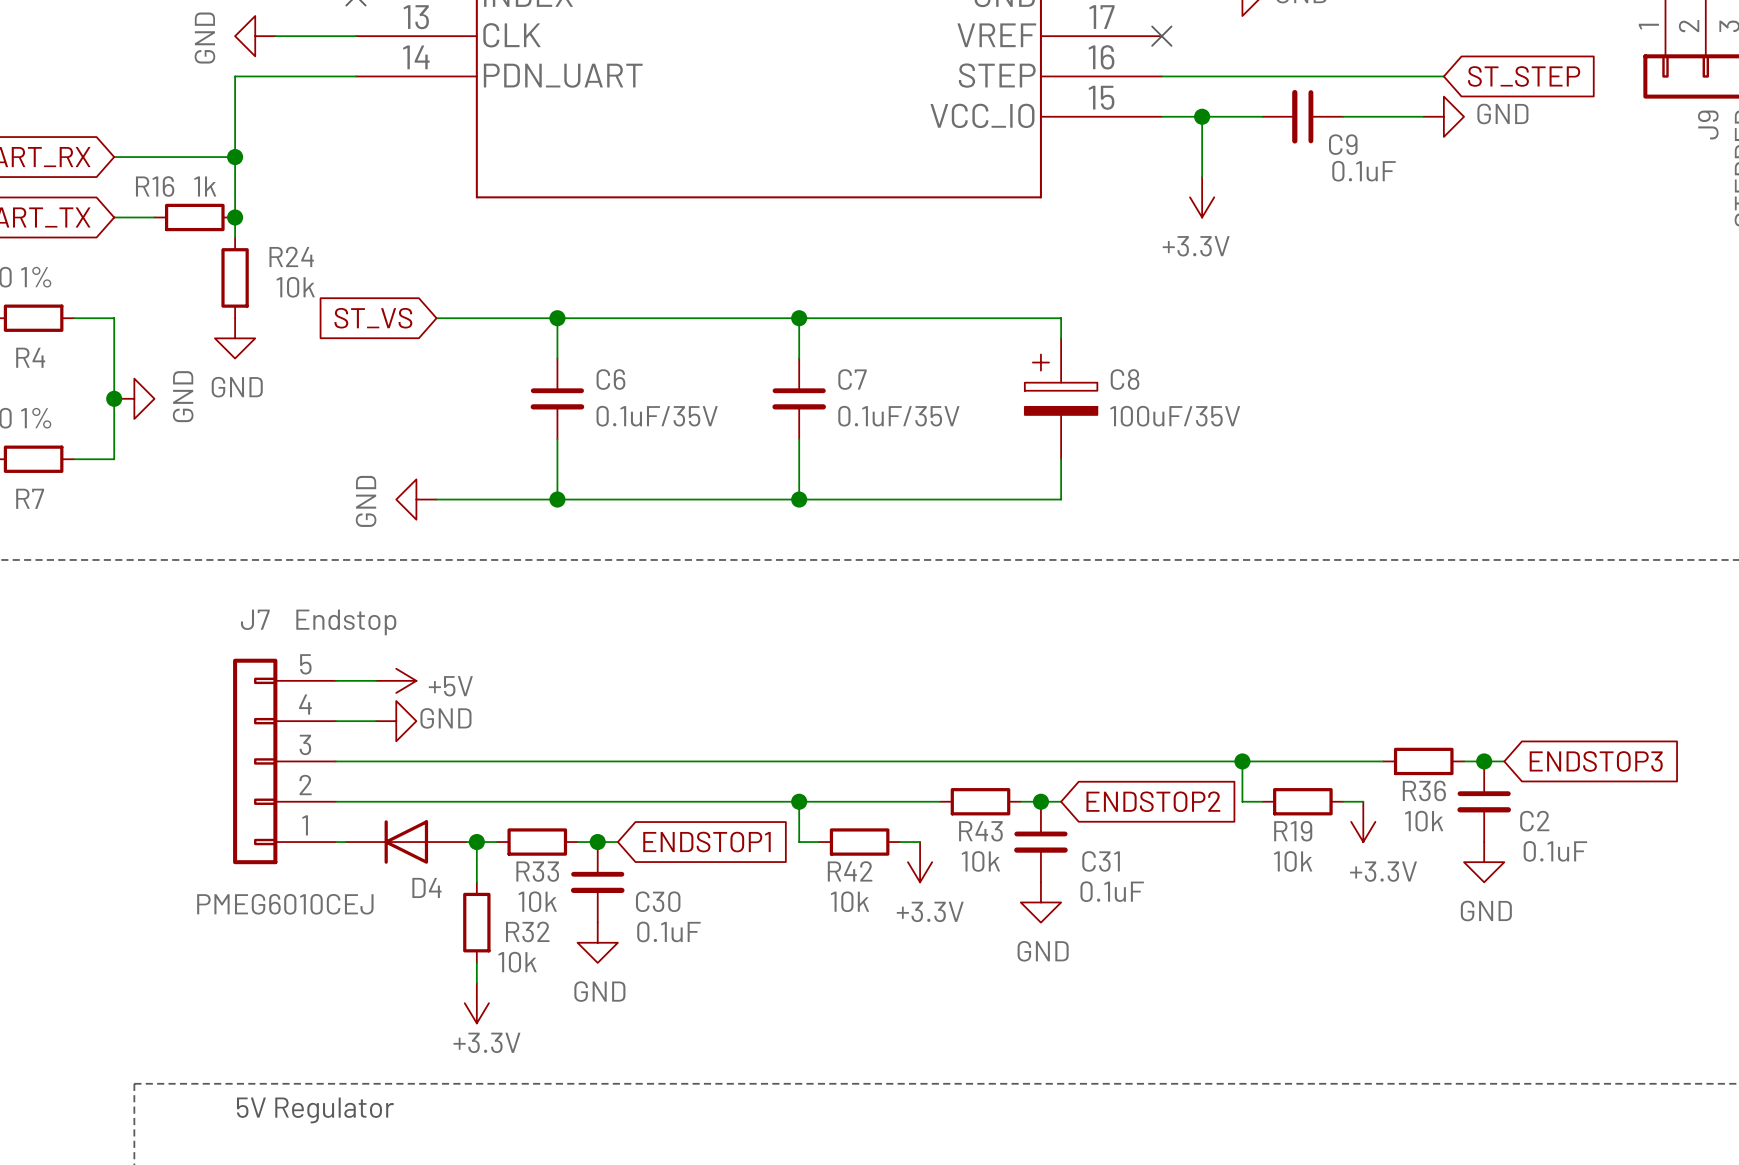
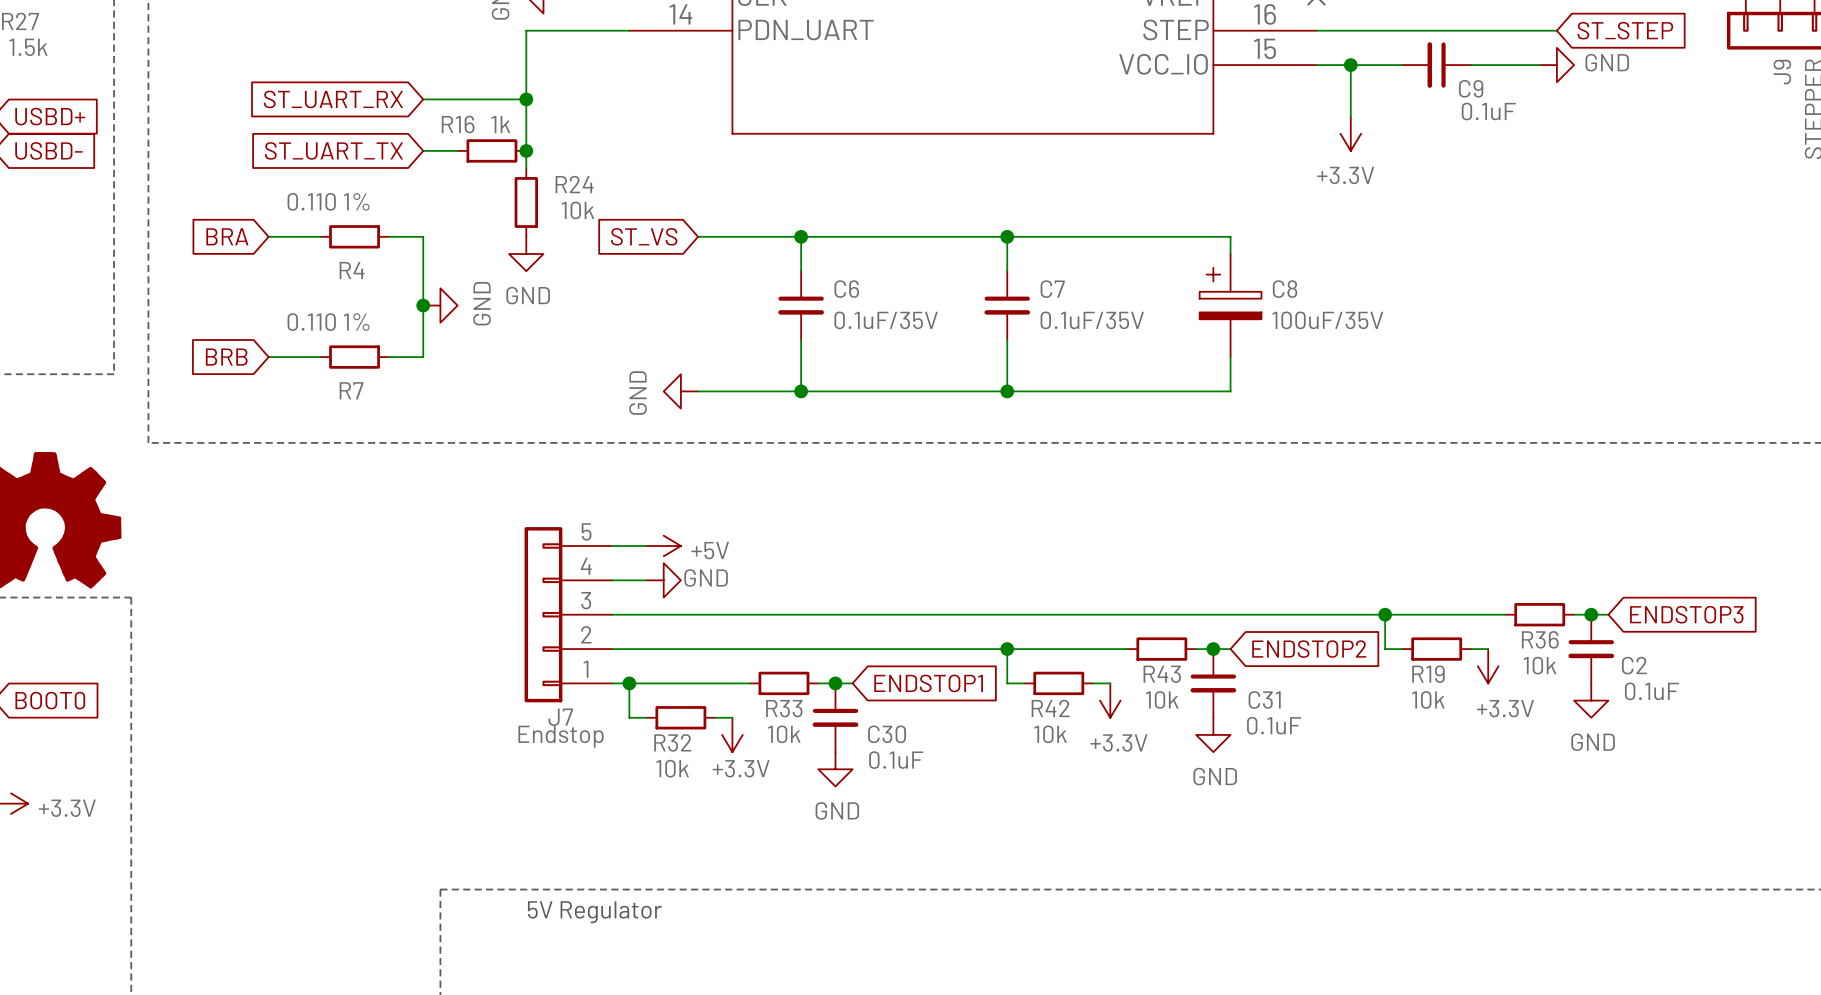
J7 name position: J7 (255, 619) -> J7 (560, 717)
J7 value position: Endstop (346, 622) -> Endstop (561, 736)
wire: none -> (629, 683) (629, 717) (646, 717)
junction: none -> (629, 683)
D4: PMEG6010CEJ (406, 842) -> none
wire: (476, 842) (476, 882) -> (715, 717) (732, 717)
junction: (476, 842) -> none
R32 rotation: 0° (476, 922) -> 90° clockwise (680, 717)
R32 position: (476, 922) -> (680, 717)
wire: (476, 962) (476, 983) -> none
R32 value position: 10k (517, 962) -> 10k (672, 768)
power symbol position: +3.3V (476, 1003) -> +3.3V (732, 734)

